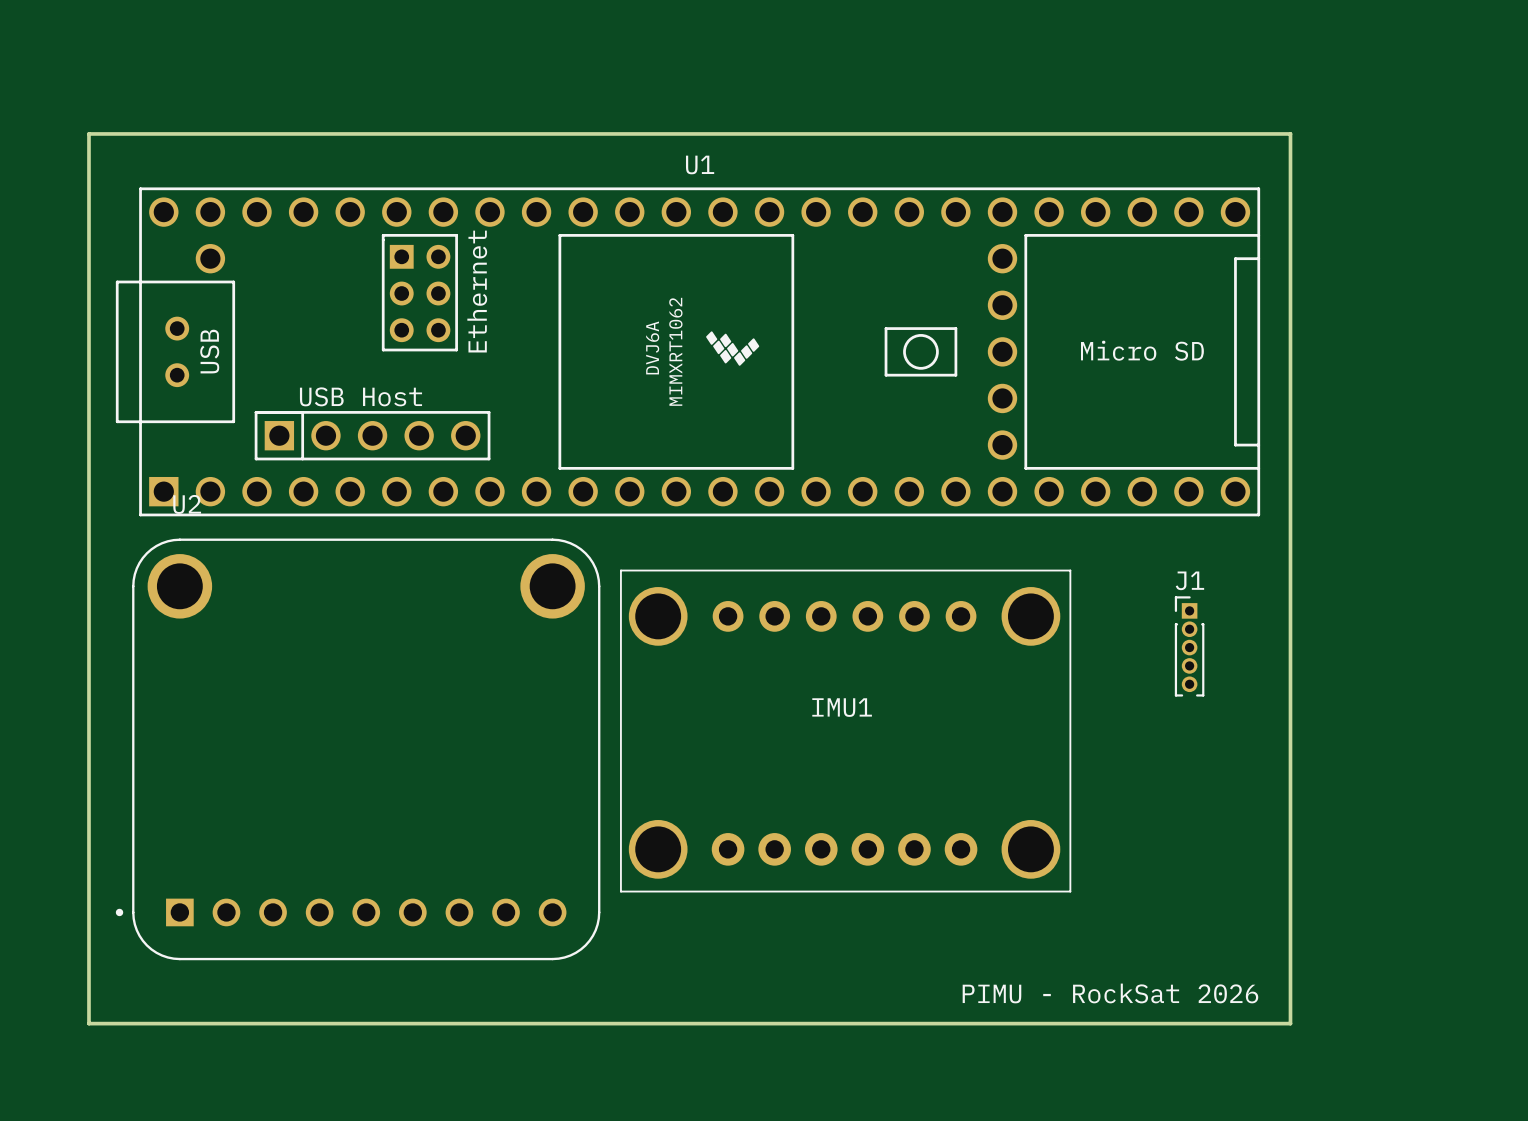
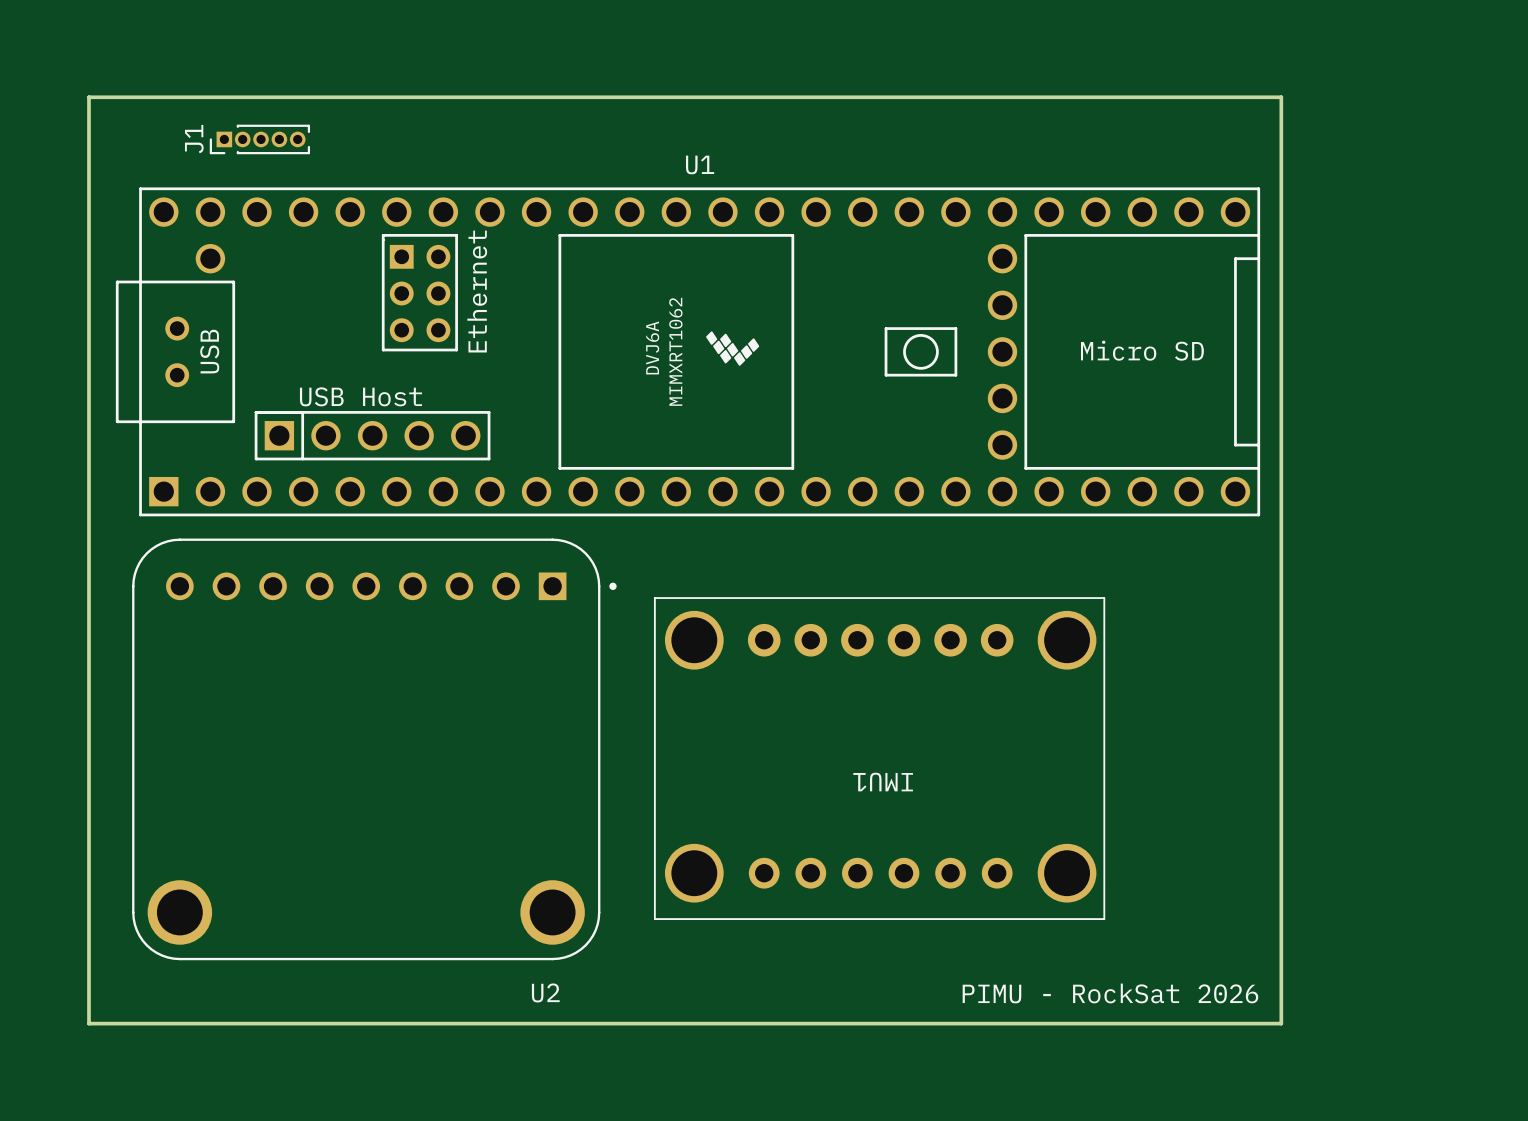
board edge: (88, 133) (1290, 133) (1290, 1023) (1281, 1023) -> (88, 133) (88, 97) (1281, 97) (1281, 1023)
line: (620, 570) (1070, 570) (1070, 891) (620, 891) (620, 570) -> (654, 598) (1104, 598) (1104, 919) (654, 919) (654, 598)
J1 rotation: 0° (1189, 646) -> 90° counterclockwise (259, 139)
J1 position: (1189, 646) -> (259, 139)
IMU1 rotation: 0° (844, 732) -> 180° (880, 756)
U2 rotation: 0° (358, 749) -> 180° (374, 749)

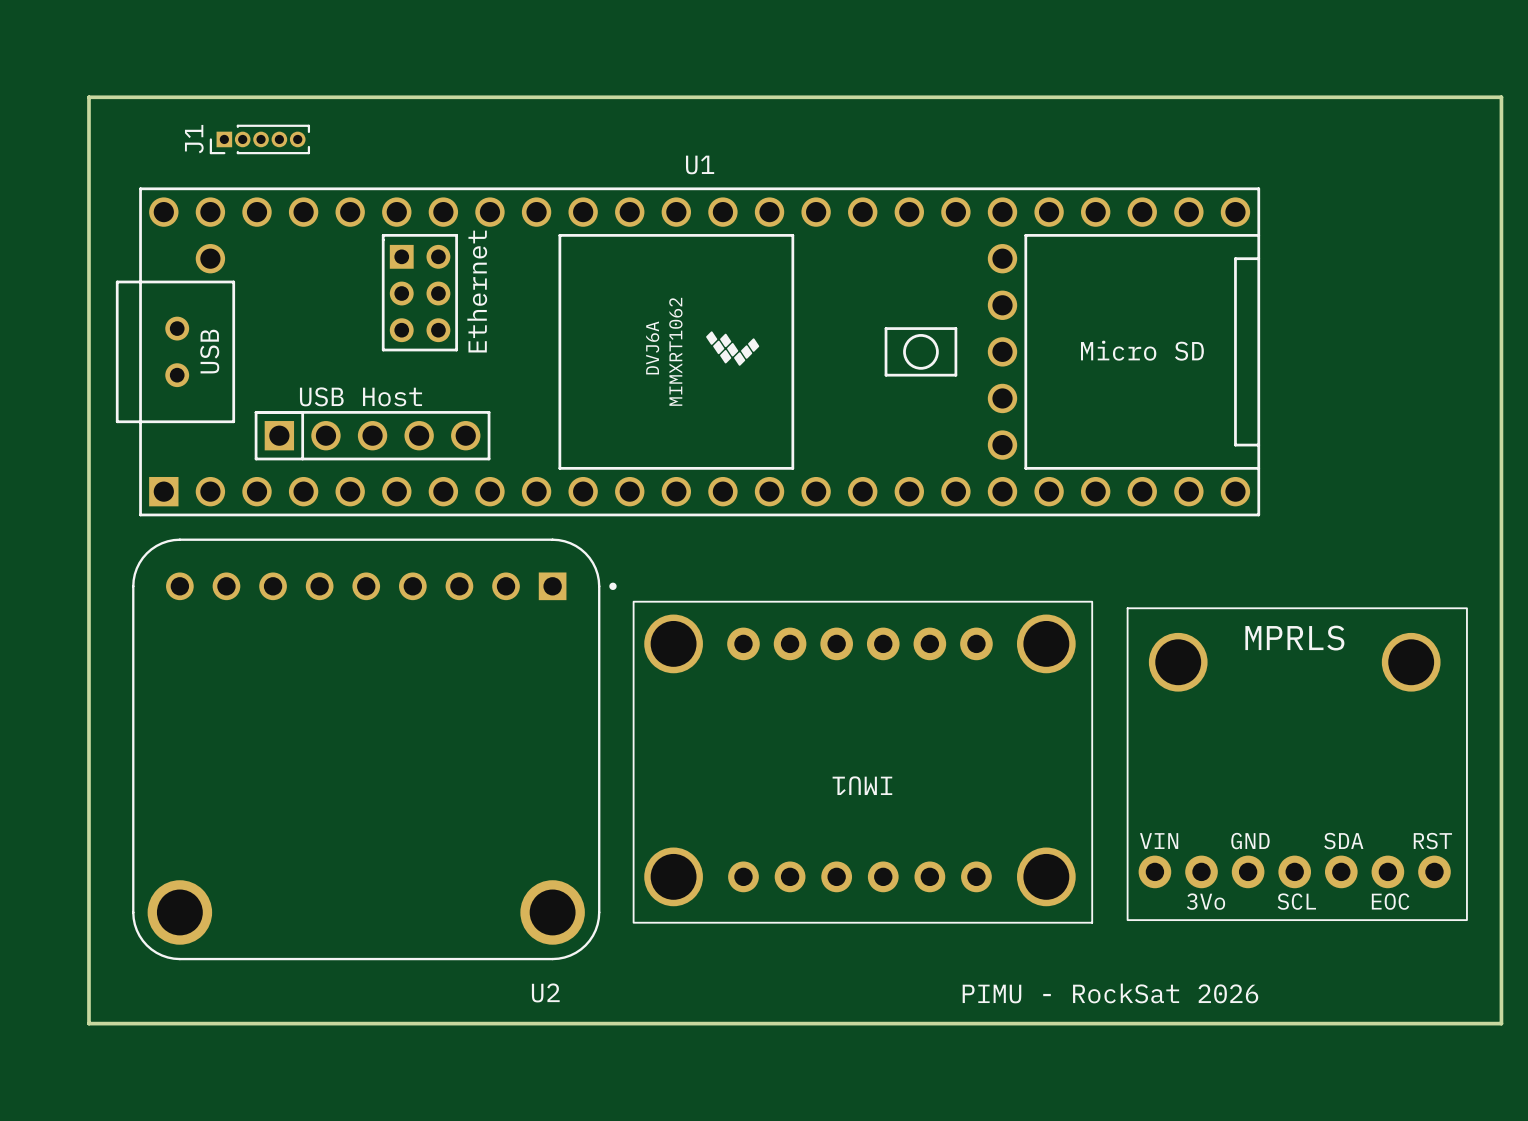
board edge: (1281, 97) (1281, 1023) -> (1281, 97) (1501, 97) (1501, 1023) (1281, 1023)
line: (654, 598) (1104, 598) (1104, 919) (654, 919) (654, 598) -> none
IMU1 footprint: [664, 610, 1097, 903] -> [632, 600, 1094, 924]
part: none -> (1297, 764)

